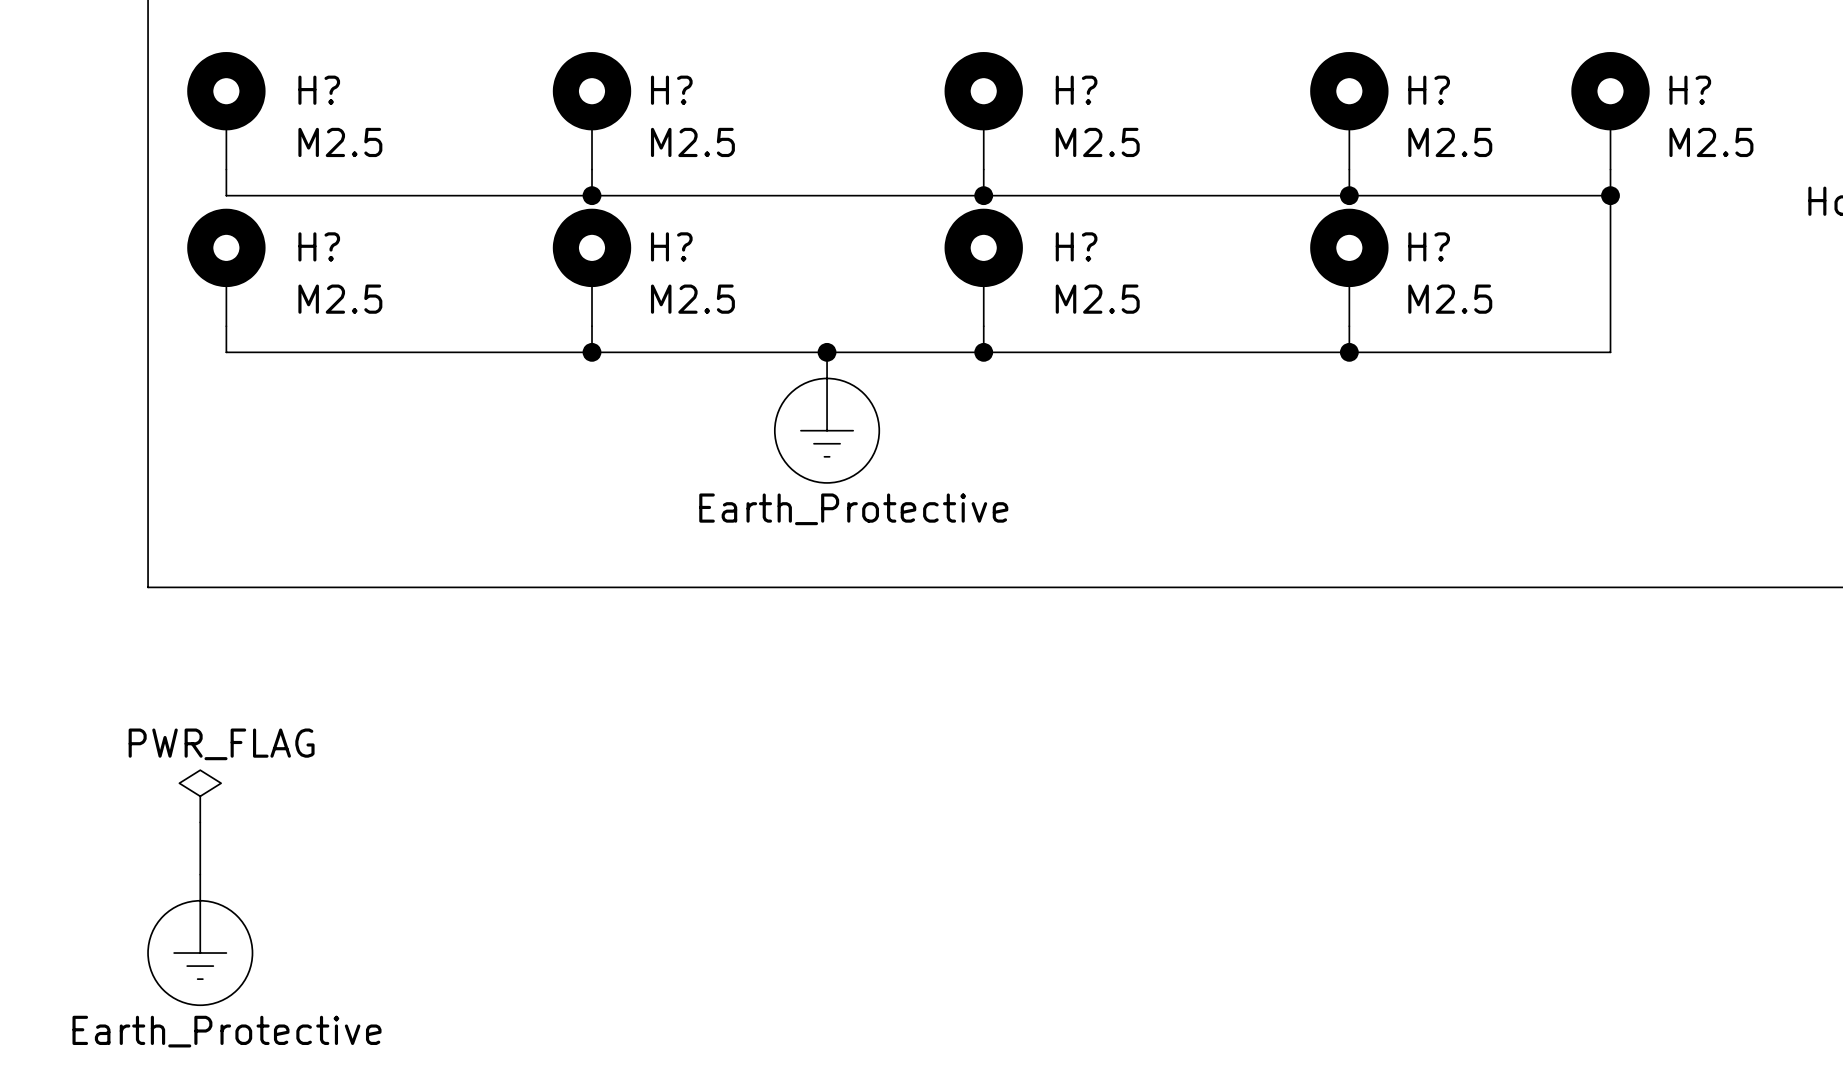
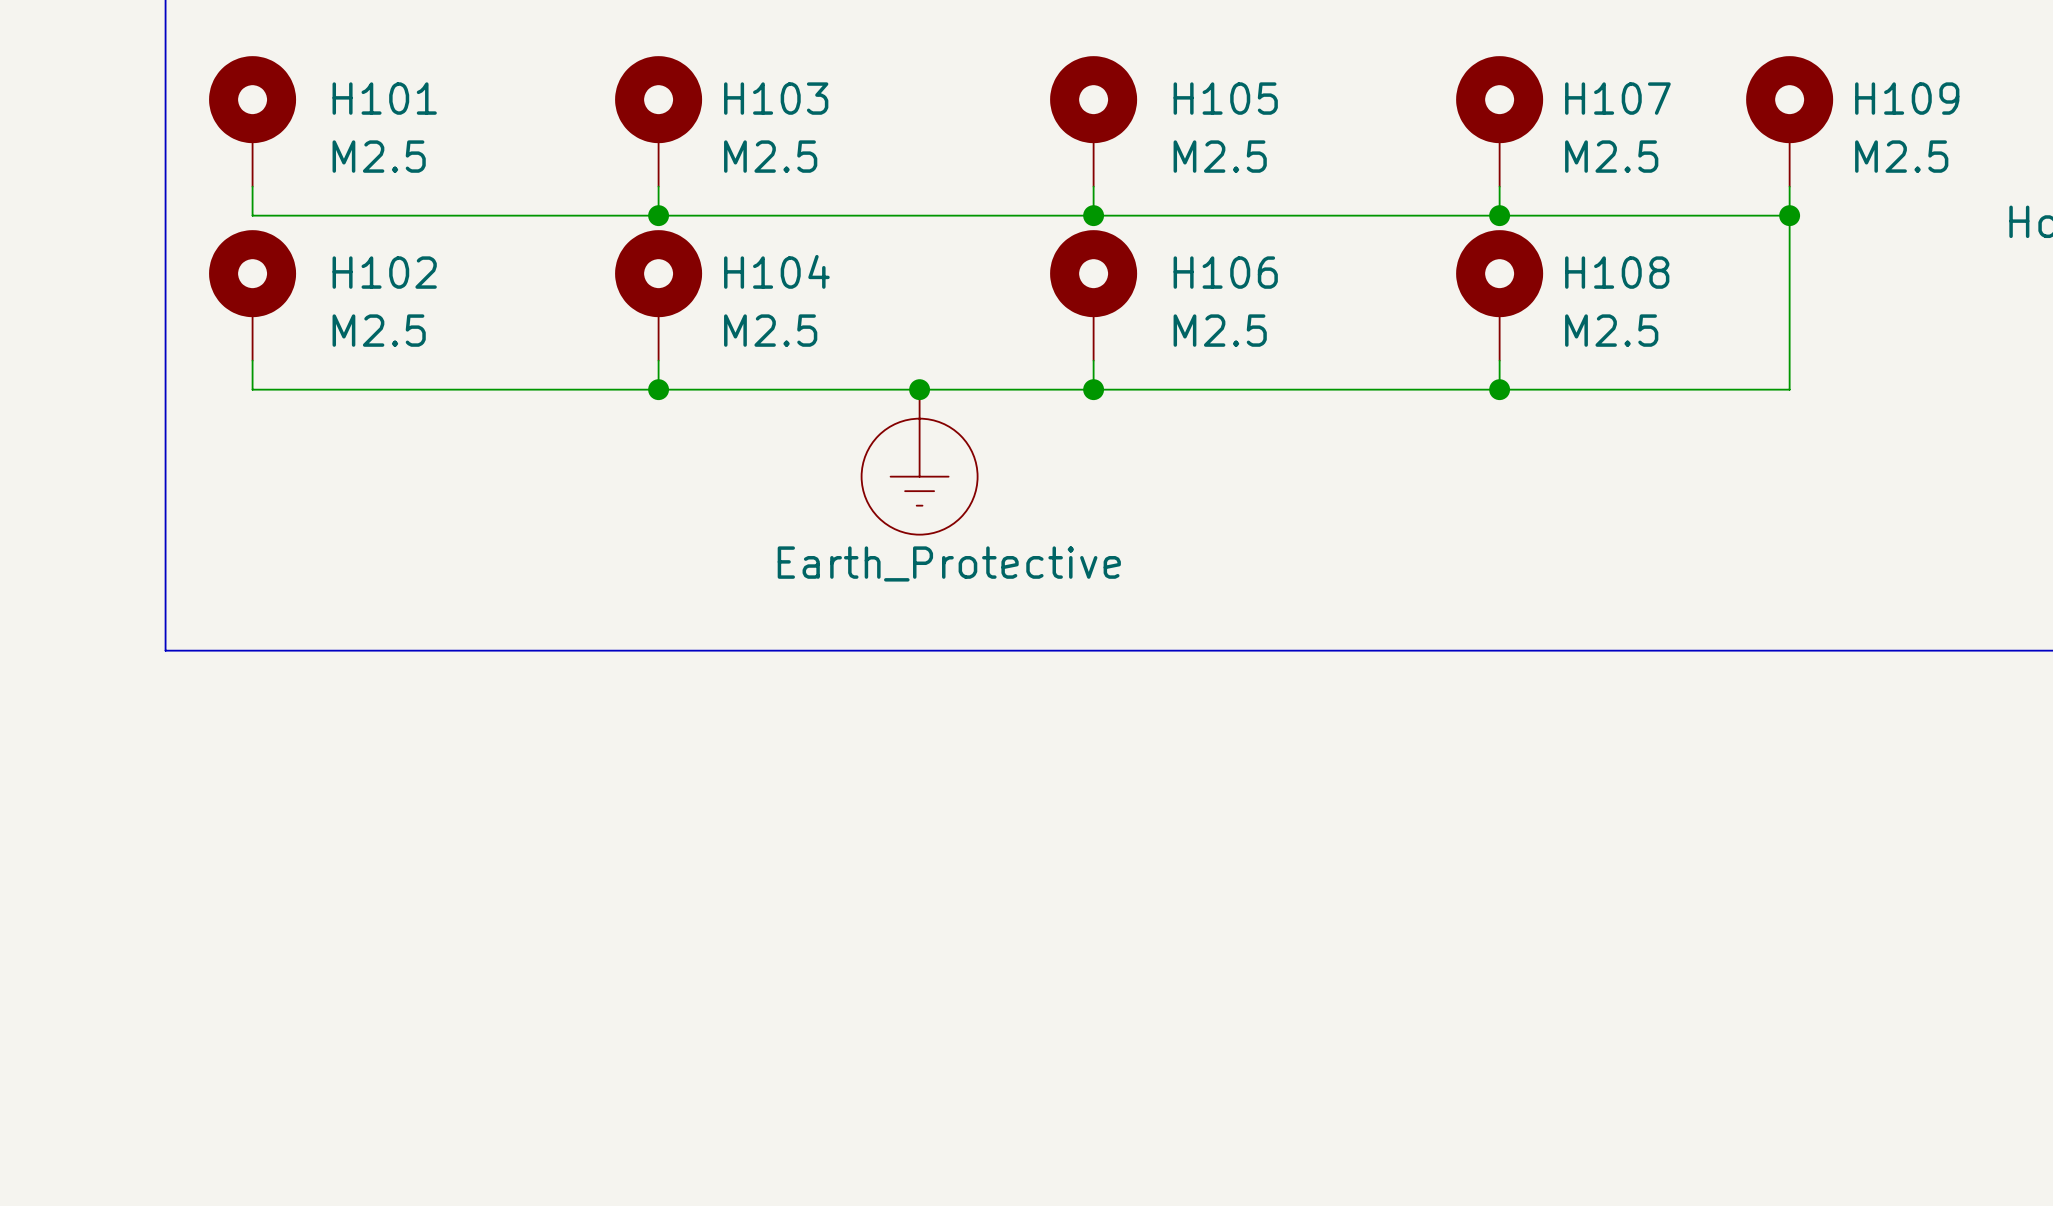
H? name: H? (319, 90) -> H101 (384, 98)
H? name: H? (671, 90) -> H103 (776, 98)
H? name: H? (1076, 90) -> H105 (1225, 98)
H? name: H? (1429, 90) -> H107 (1617, 98)
H? name: H? (1690, 90) -> H109 (1907, 98)
H? name: H? (319, 246) -> H102 (384, 272)
H? name: H? (671, 246) -> H104 (776, 271)
H? name: H? (1076, 246) -> H106 (1225, 272)
H? name: H? (1429, 246) -> H108 (1617, 272)
power symbol: PWR_FLAG (200, 796) -> none
wire: (200, 822) (200, 874) -> none
power symbol: Earth_Protective (200, 939) -> none

